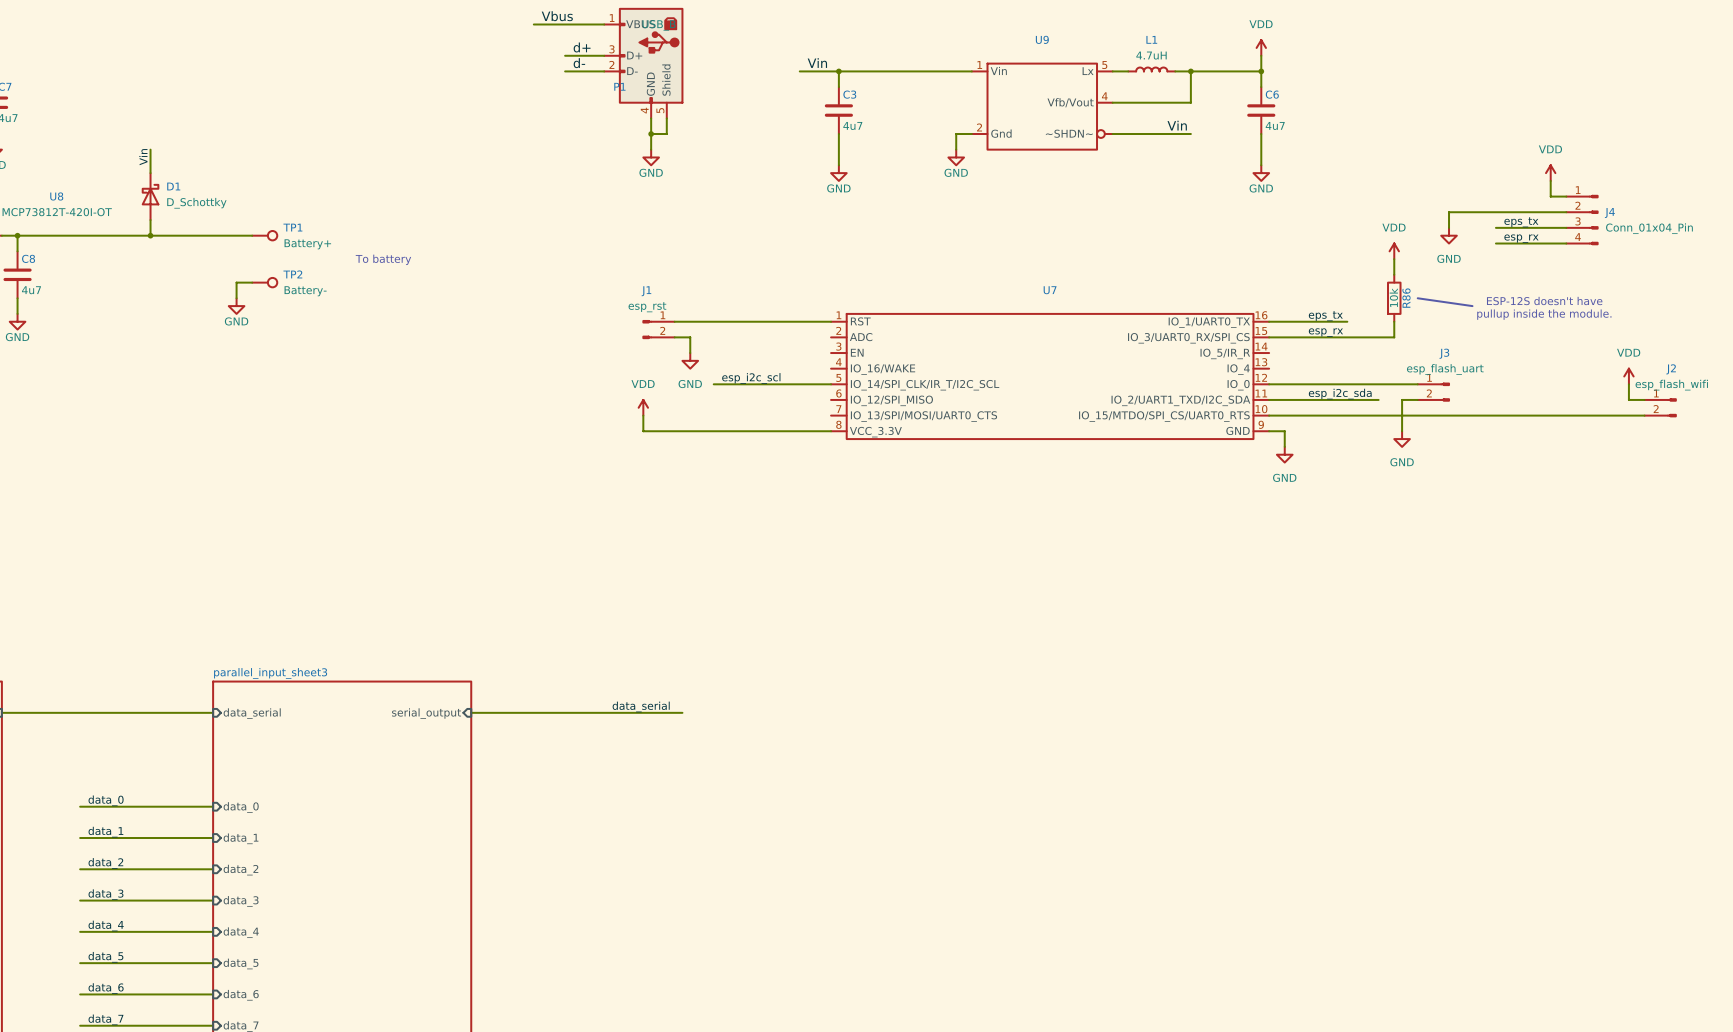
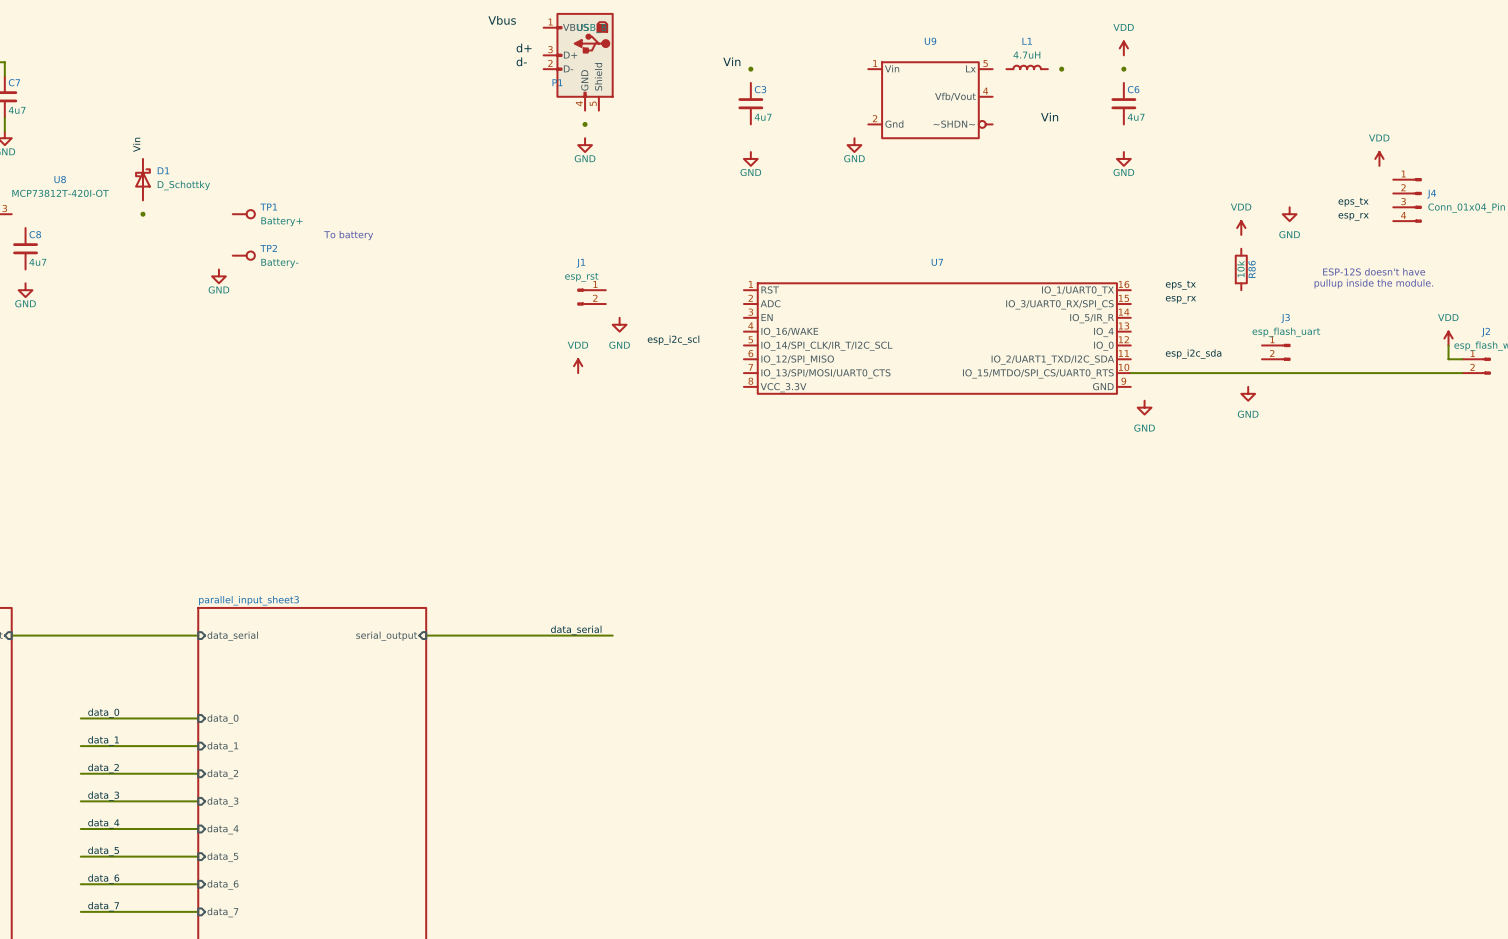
wire: (533, 24) (604, 24) -> none
wire: (565, 55) (604, 55) -> none
wire: (1261, 55) (1261, 87) -> none
wire: (565, 71) (604, 71) -> none
wire: (799, 71) (971, 71) -> none
wire: (838, 71) (838, 87) -> none
wire: (1112, 71) (1128, 71) -> none
wire: (1175, 71) (1261, 71) -> none
wire: (1190, 71) (1190, 102) (1112, 102) -> none
wire: (651, 118) (651, 149) -> none
wire: (666, 118) (666, 134) (651, 134) -> none
wire: (838, 134) (838, 165) -> none
wire: (971, 134) (956, 134) (956, 149) -> none
wire: (1112, 134) (1190, 134) -> none
wire: (1261, 134) (1261, 165) -> none
wire: (150, 149) (150, 173) -> none
wire: (1550, 180) (1550, 196) (1566, 196) -> none
wire: (1566, 212) (1449, 212) (1449, 227) -> none
wire: (150, 220) (150, 235) -> none
wire: (1495, 227) (1566, 227) -> none
wire: (1, 235) (252, 235) -> none
wire: (17, 235) (17, 251) -> none
junction: (17, 235) -> none
wire: (1495, 243) (1566, 243) -> none
wire: (1394, 259) (1394, 274) -> none
wire: (252, 282) (236, 282) (236, 298) -> none
wire: (17, 298) (17, 313) -> none
line: (1417, 298) (1472, 306) -> none
wire: (674, 321) (831, 321) -> none
wire: (1269, 321) (1347, 321) -> none
wire: (1394, 321) (1394, 337) (1269, 337) -> none
wire: (674, 337) (690, 337) (690, 353) -> none
wire: (713, 384) (831, 384) -> none
wire: (1269, 384) (1417, 384) -> none
wire: (1269, 399) (1378, 399) -> none
wire: (1417, 399) (1402, 399) (1402, 431) -> none
wire: (643, 415) (643, 431) (831, 431) -> none
wire: (1269, 431) (1284, 431) (1284, 446) -> none

